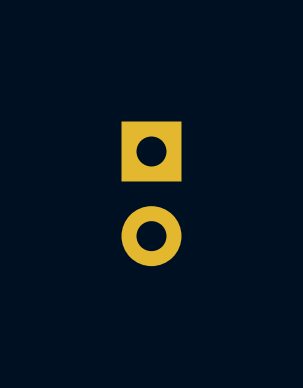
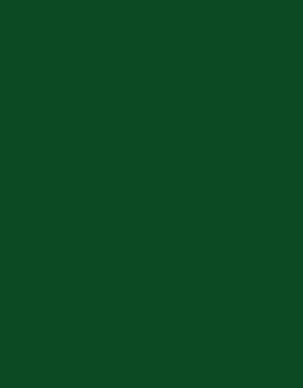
part: (151, 193) -> none

